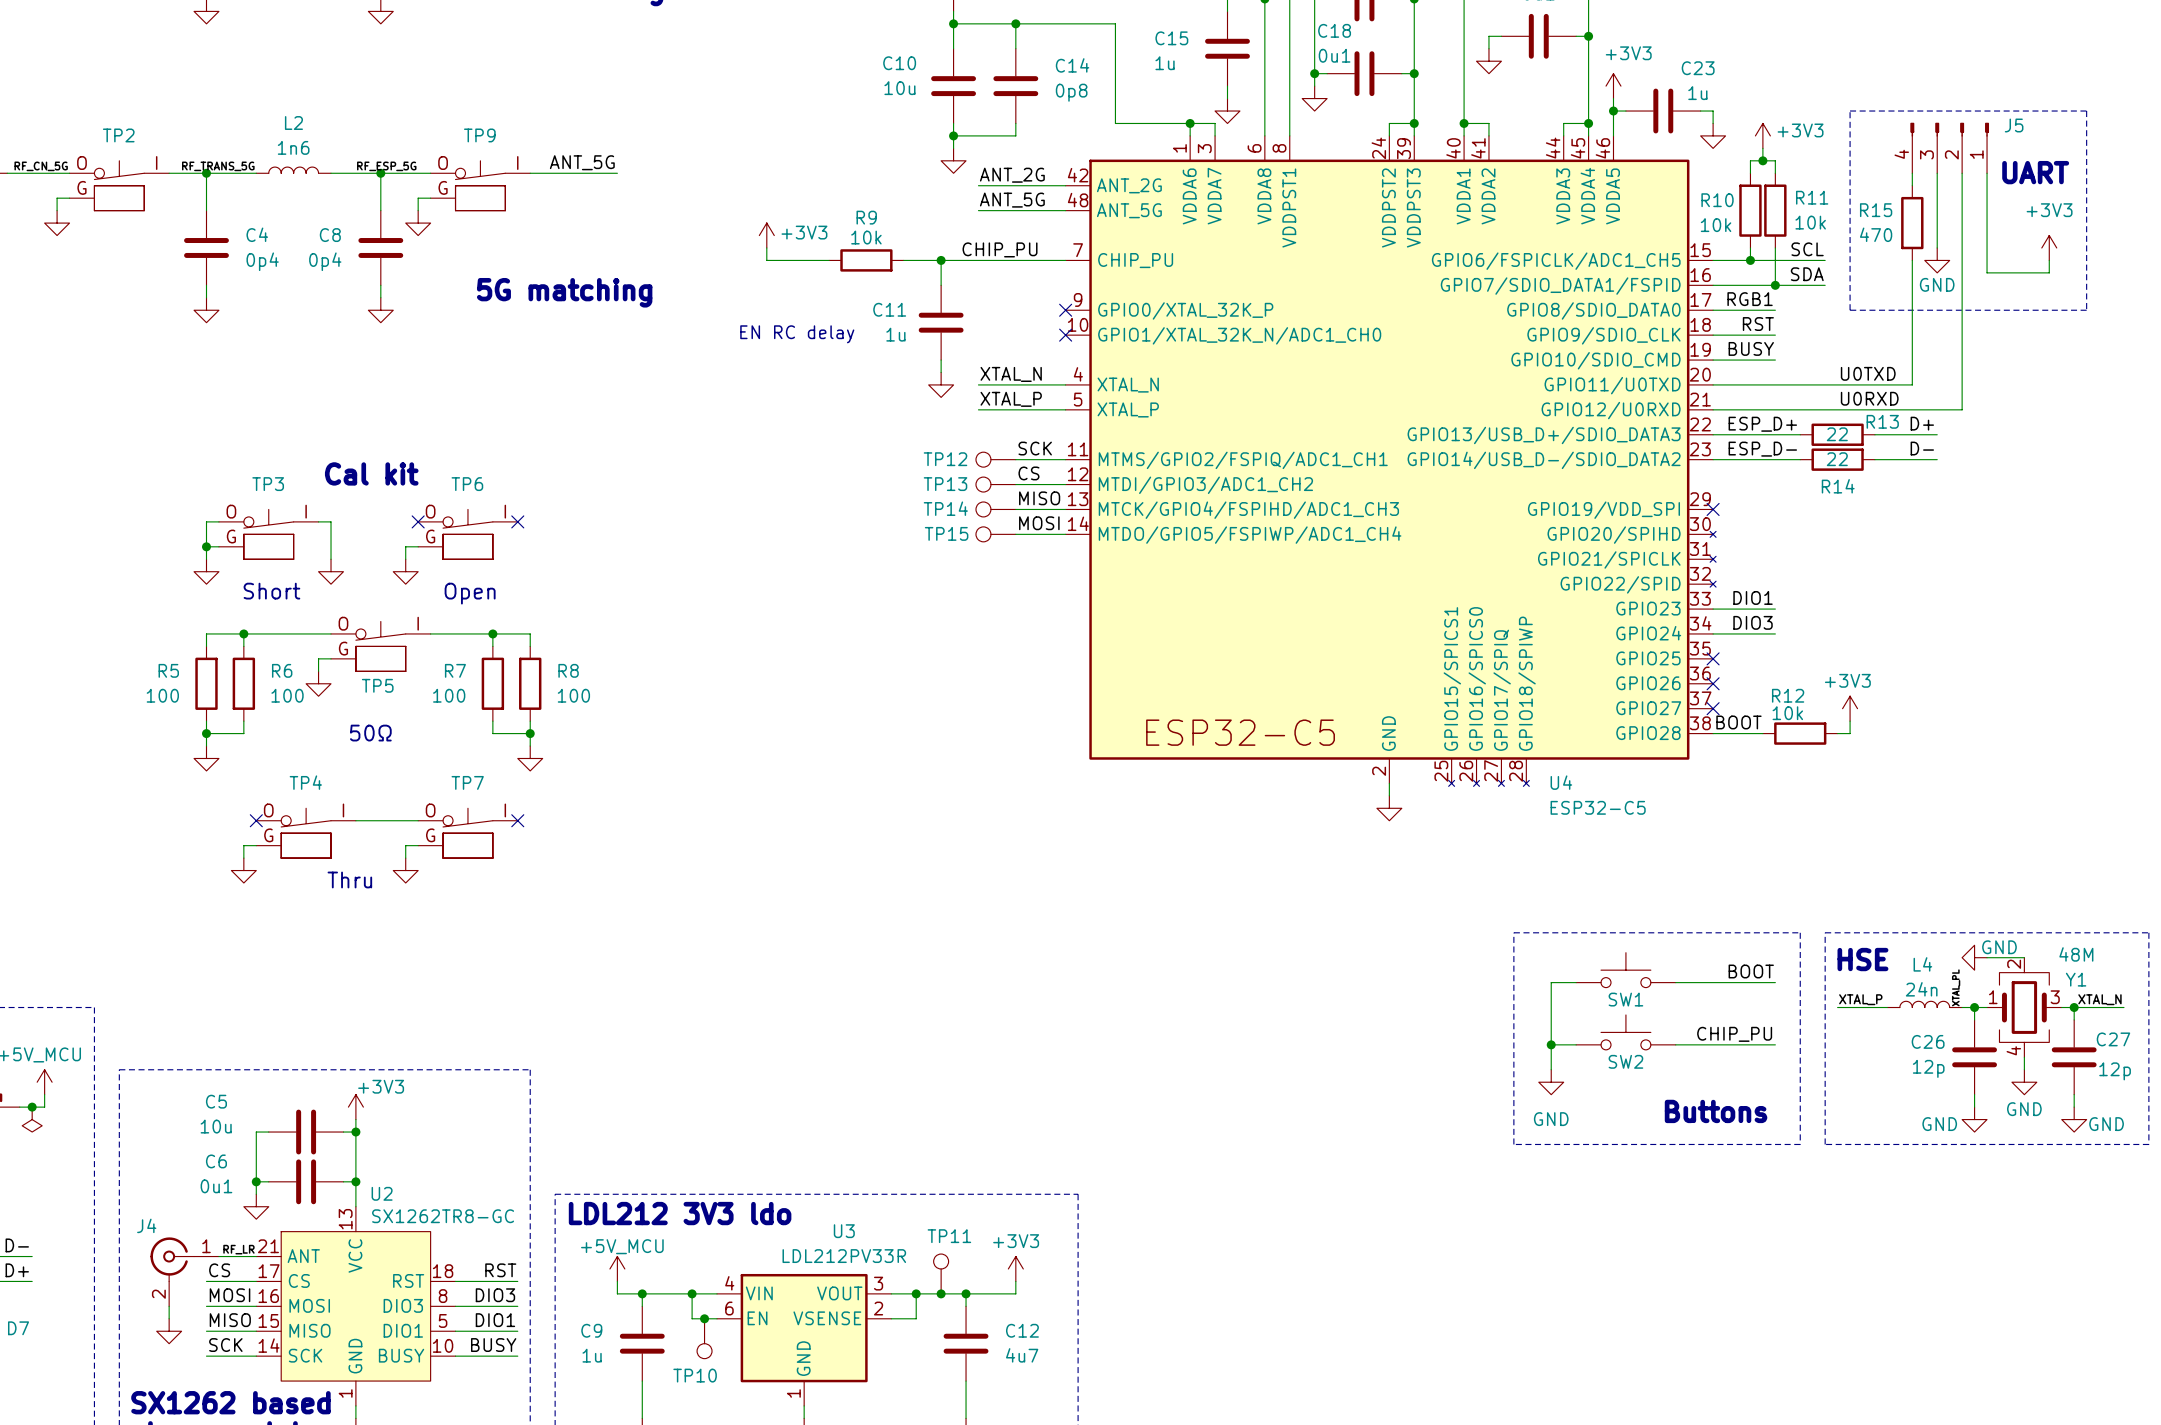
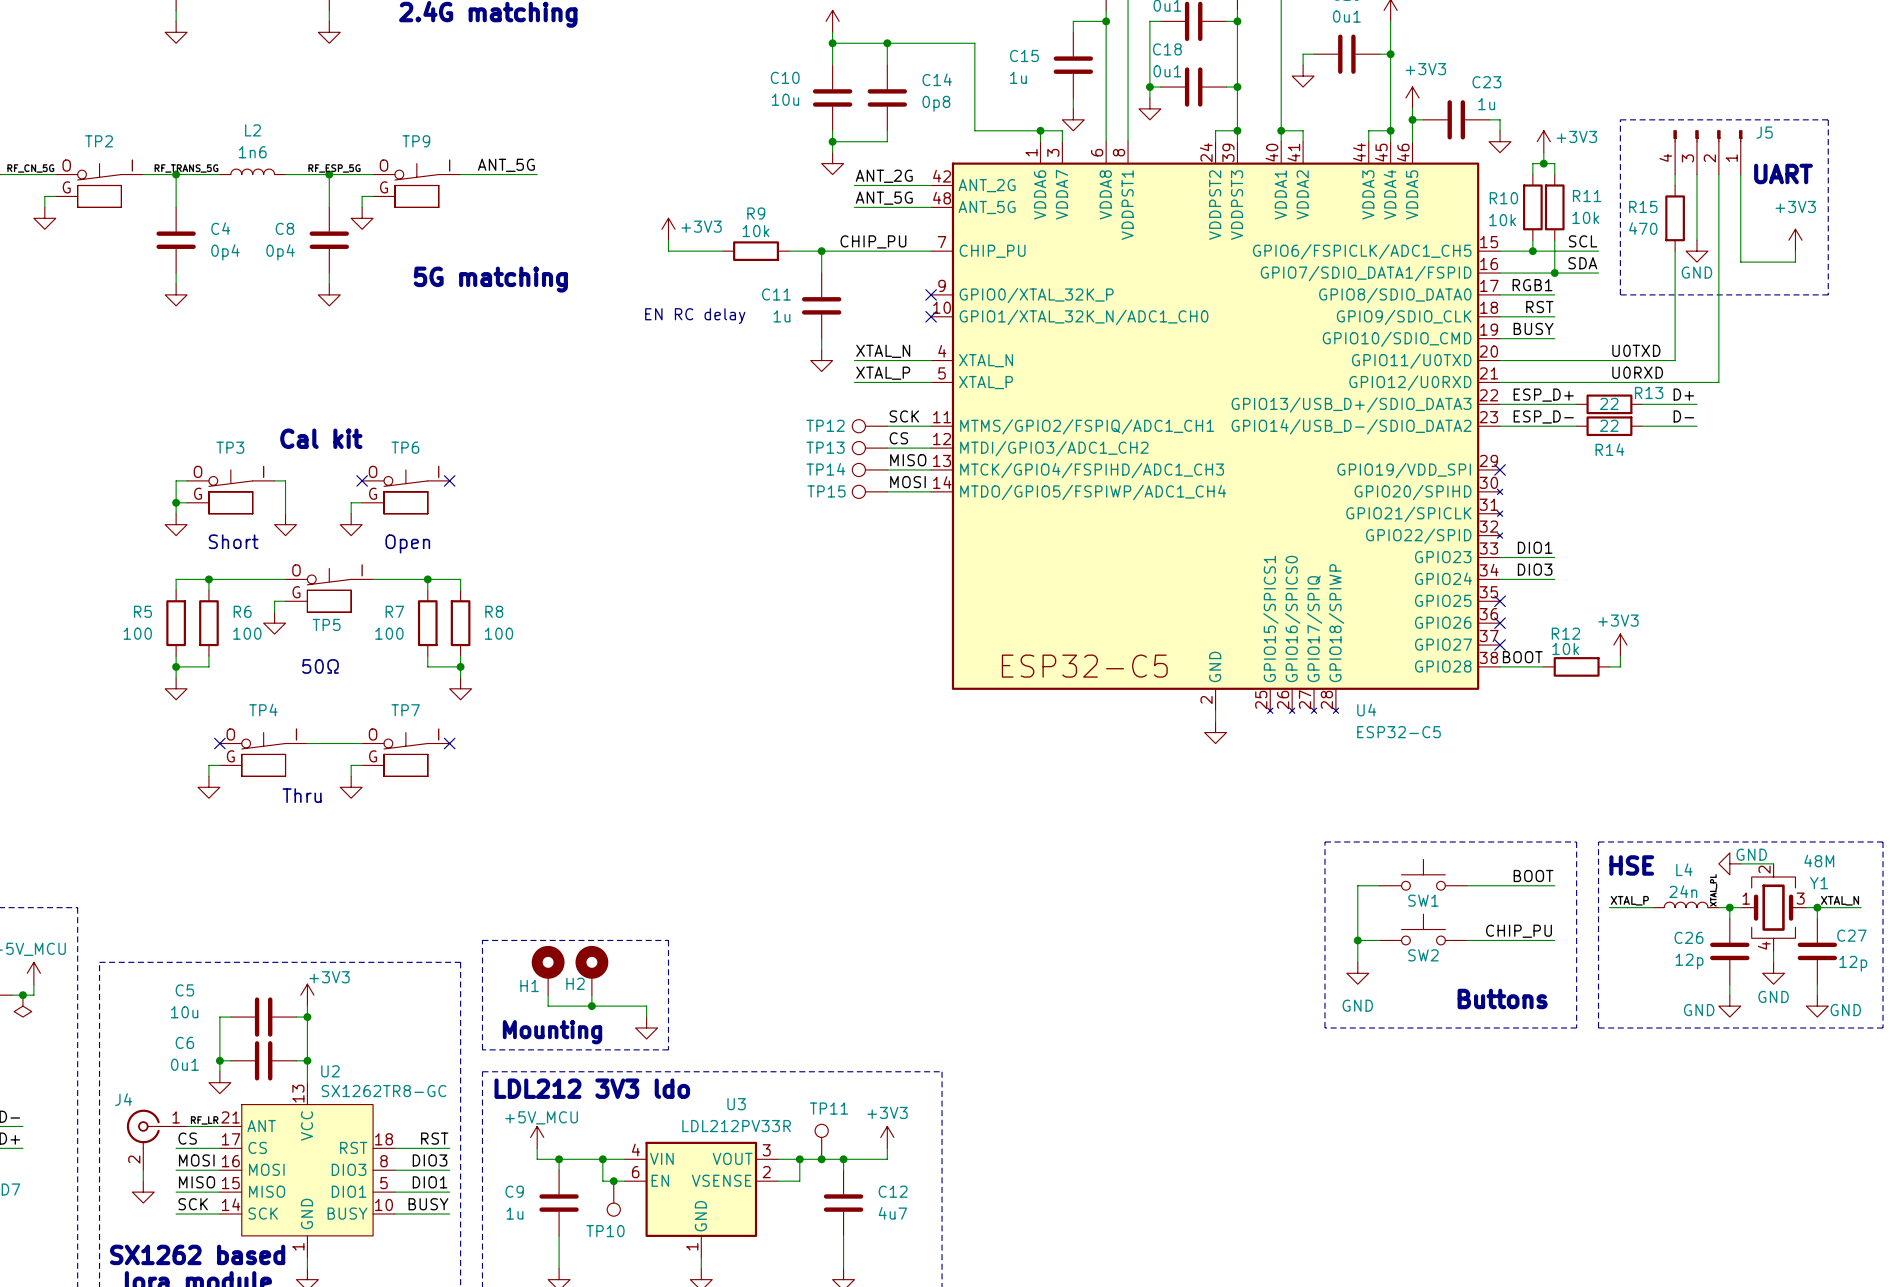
line: none -> (482, 940) (668, 940) (668, 1049) (482, 1049) (482, 940)
H1: none -> (548, 970)
H2: none -> (591, 970)
wire: none -> (548, 995) (548, 1006) (646, 1006) (646, 1017)
wire: none -> (591, 995) (591, 1006)
junction: none -> (591, 1006)
power symbol: none -> (646, 1027)
text: none -> Mounting (552, 1032)

